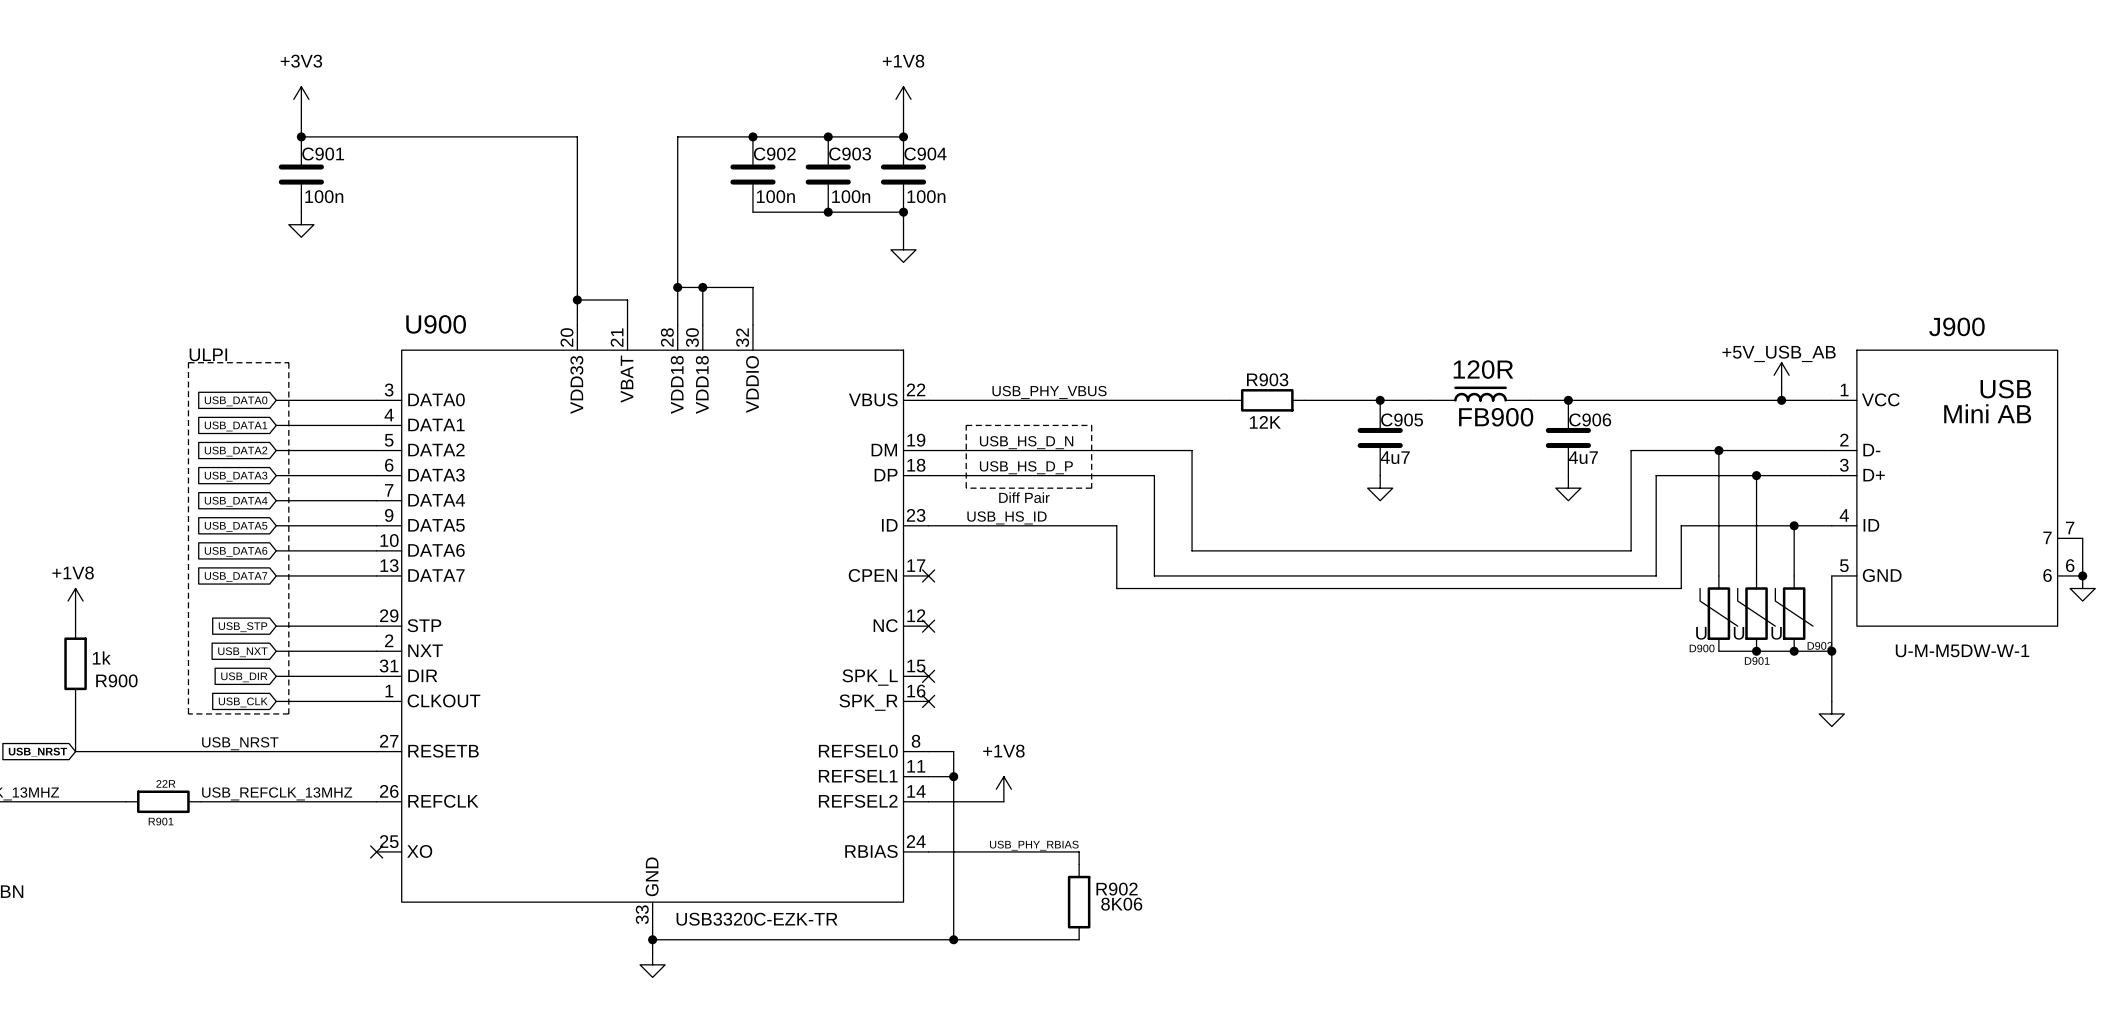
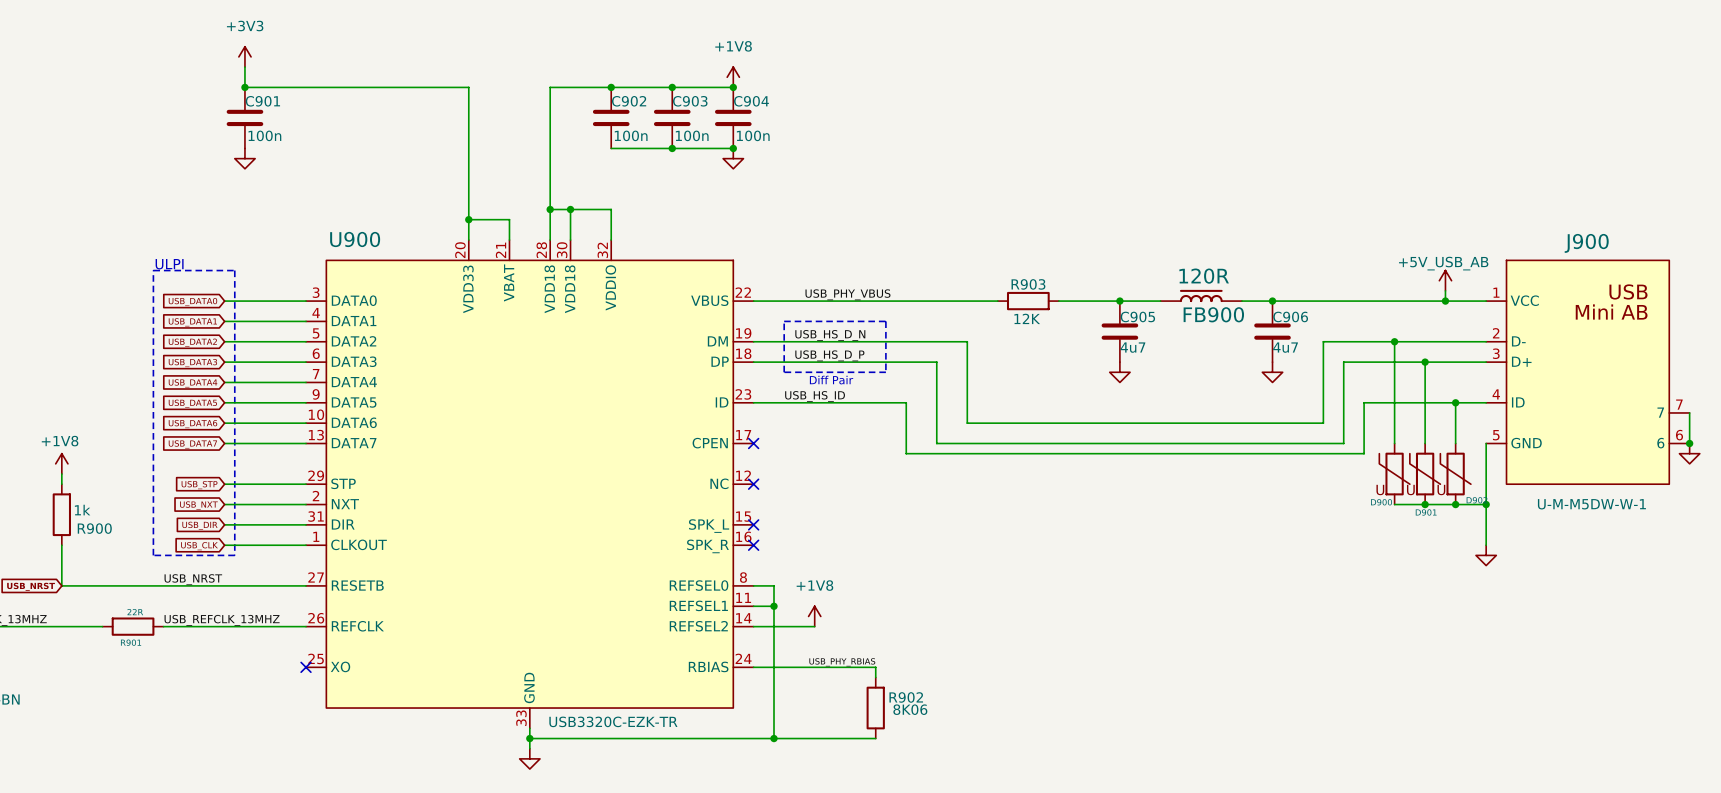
power symbol position: +1V8 (903, 99) -> +1V8 (733, 77)
power symbol position: (903, 249) -> (733, 158)

